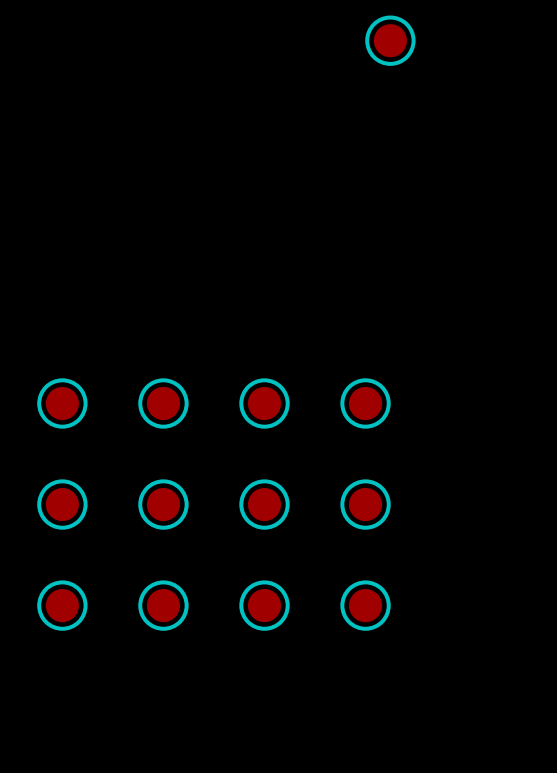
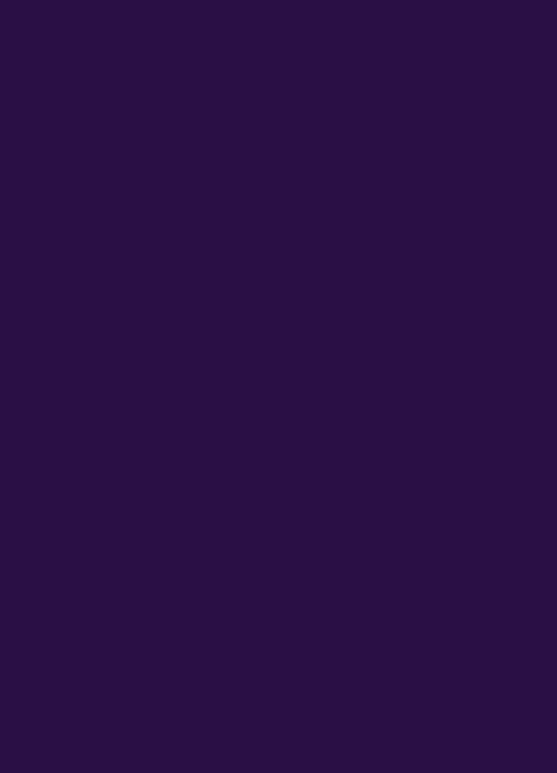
part: (390, 40) -> none
part: (62, 403) -> none
part: (163, 403) -> none
part: (264, 403) -> none
part: (365, 403) -> none
part: (62, 504) -> none
part: (163, 504) -> none
part: (264, 504) -> none
part: (365, 504) -> none
part: (62, 605) -> none
part: (163, 605) -> none
part: (264, 605) -> none
part: (365, 605) -> none

